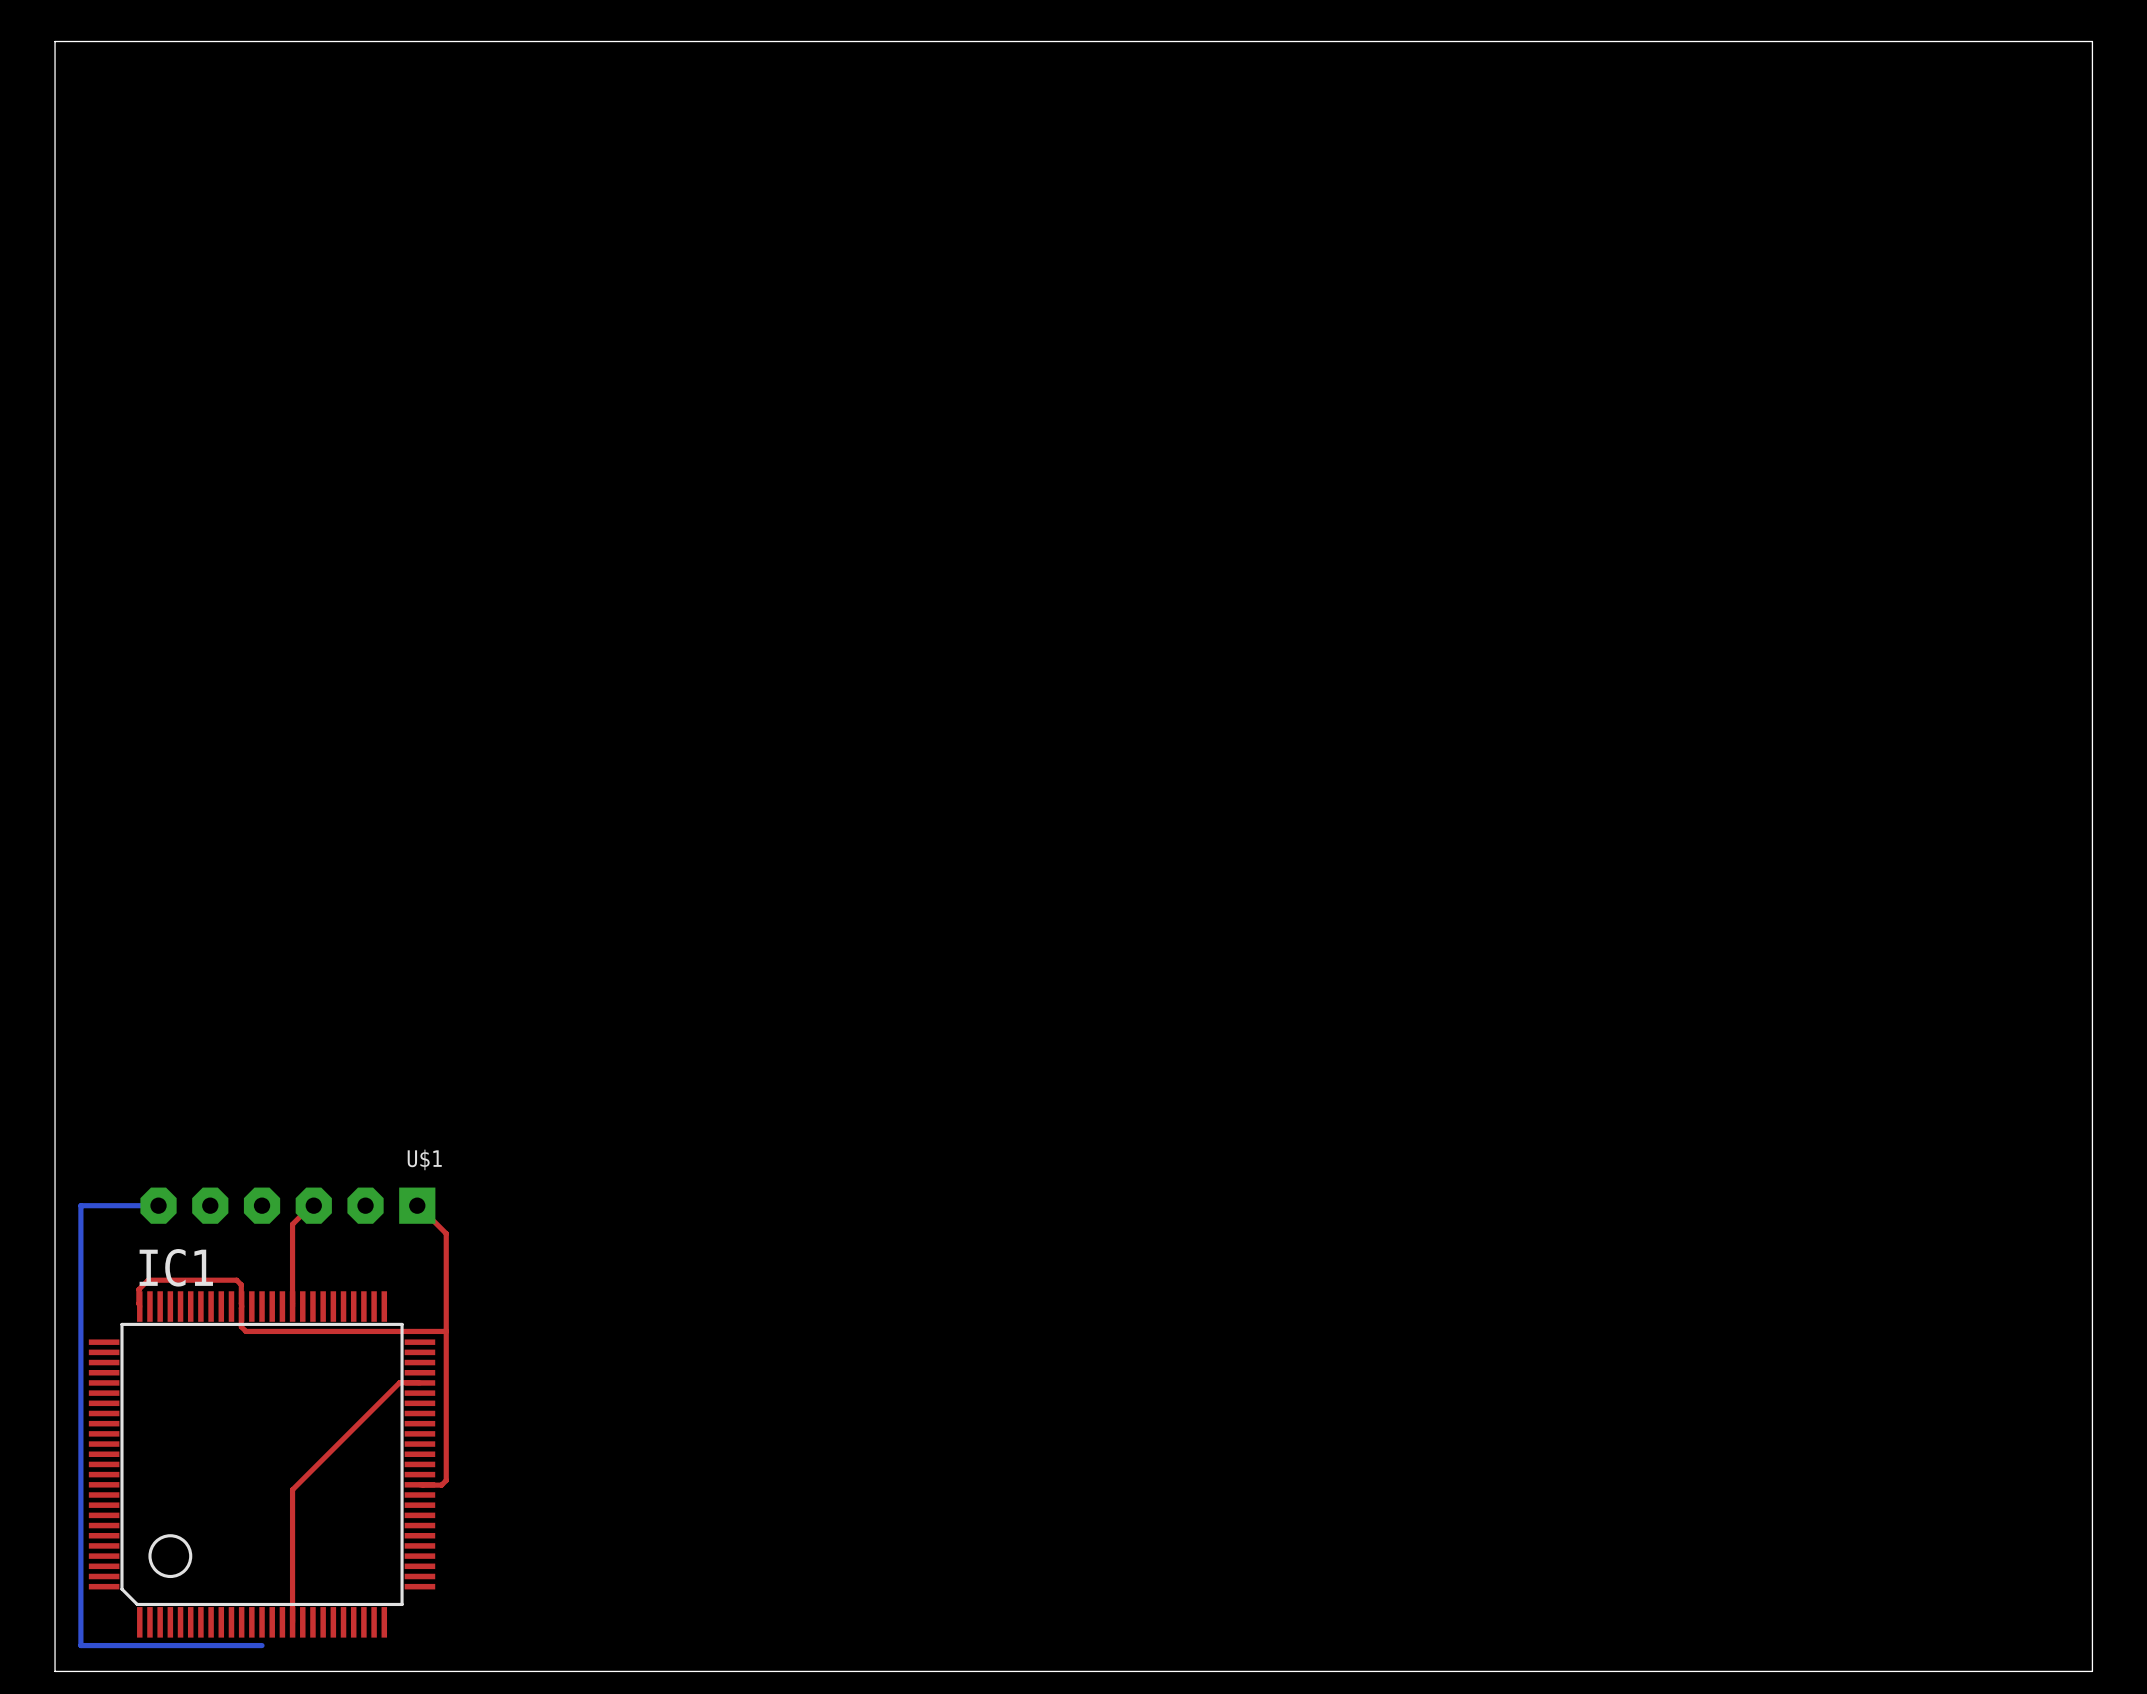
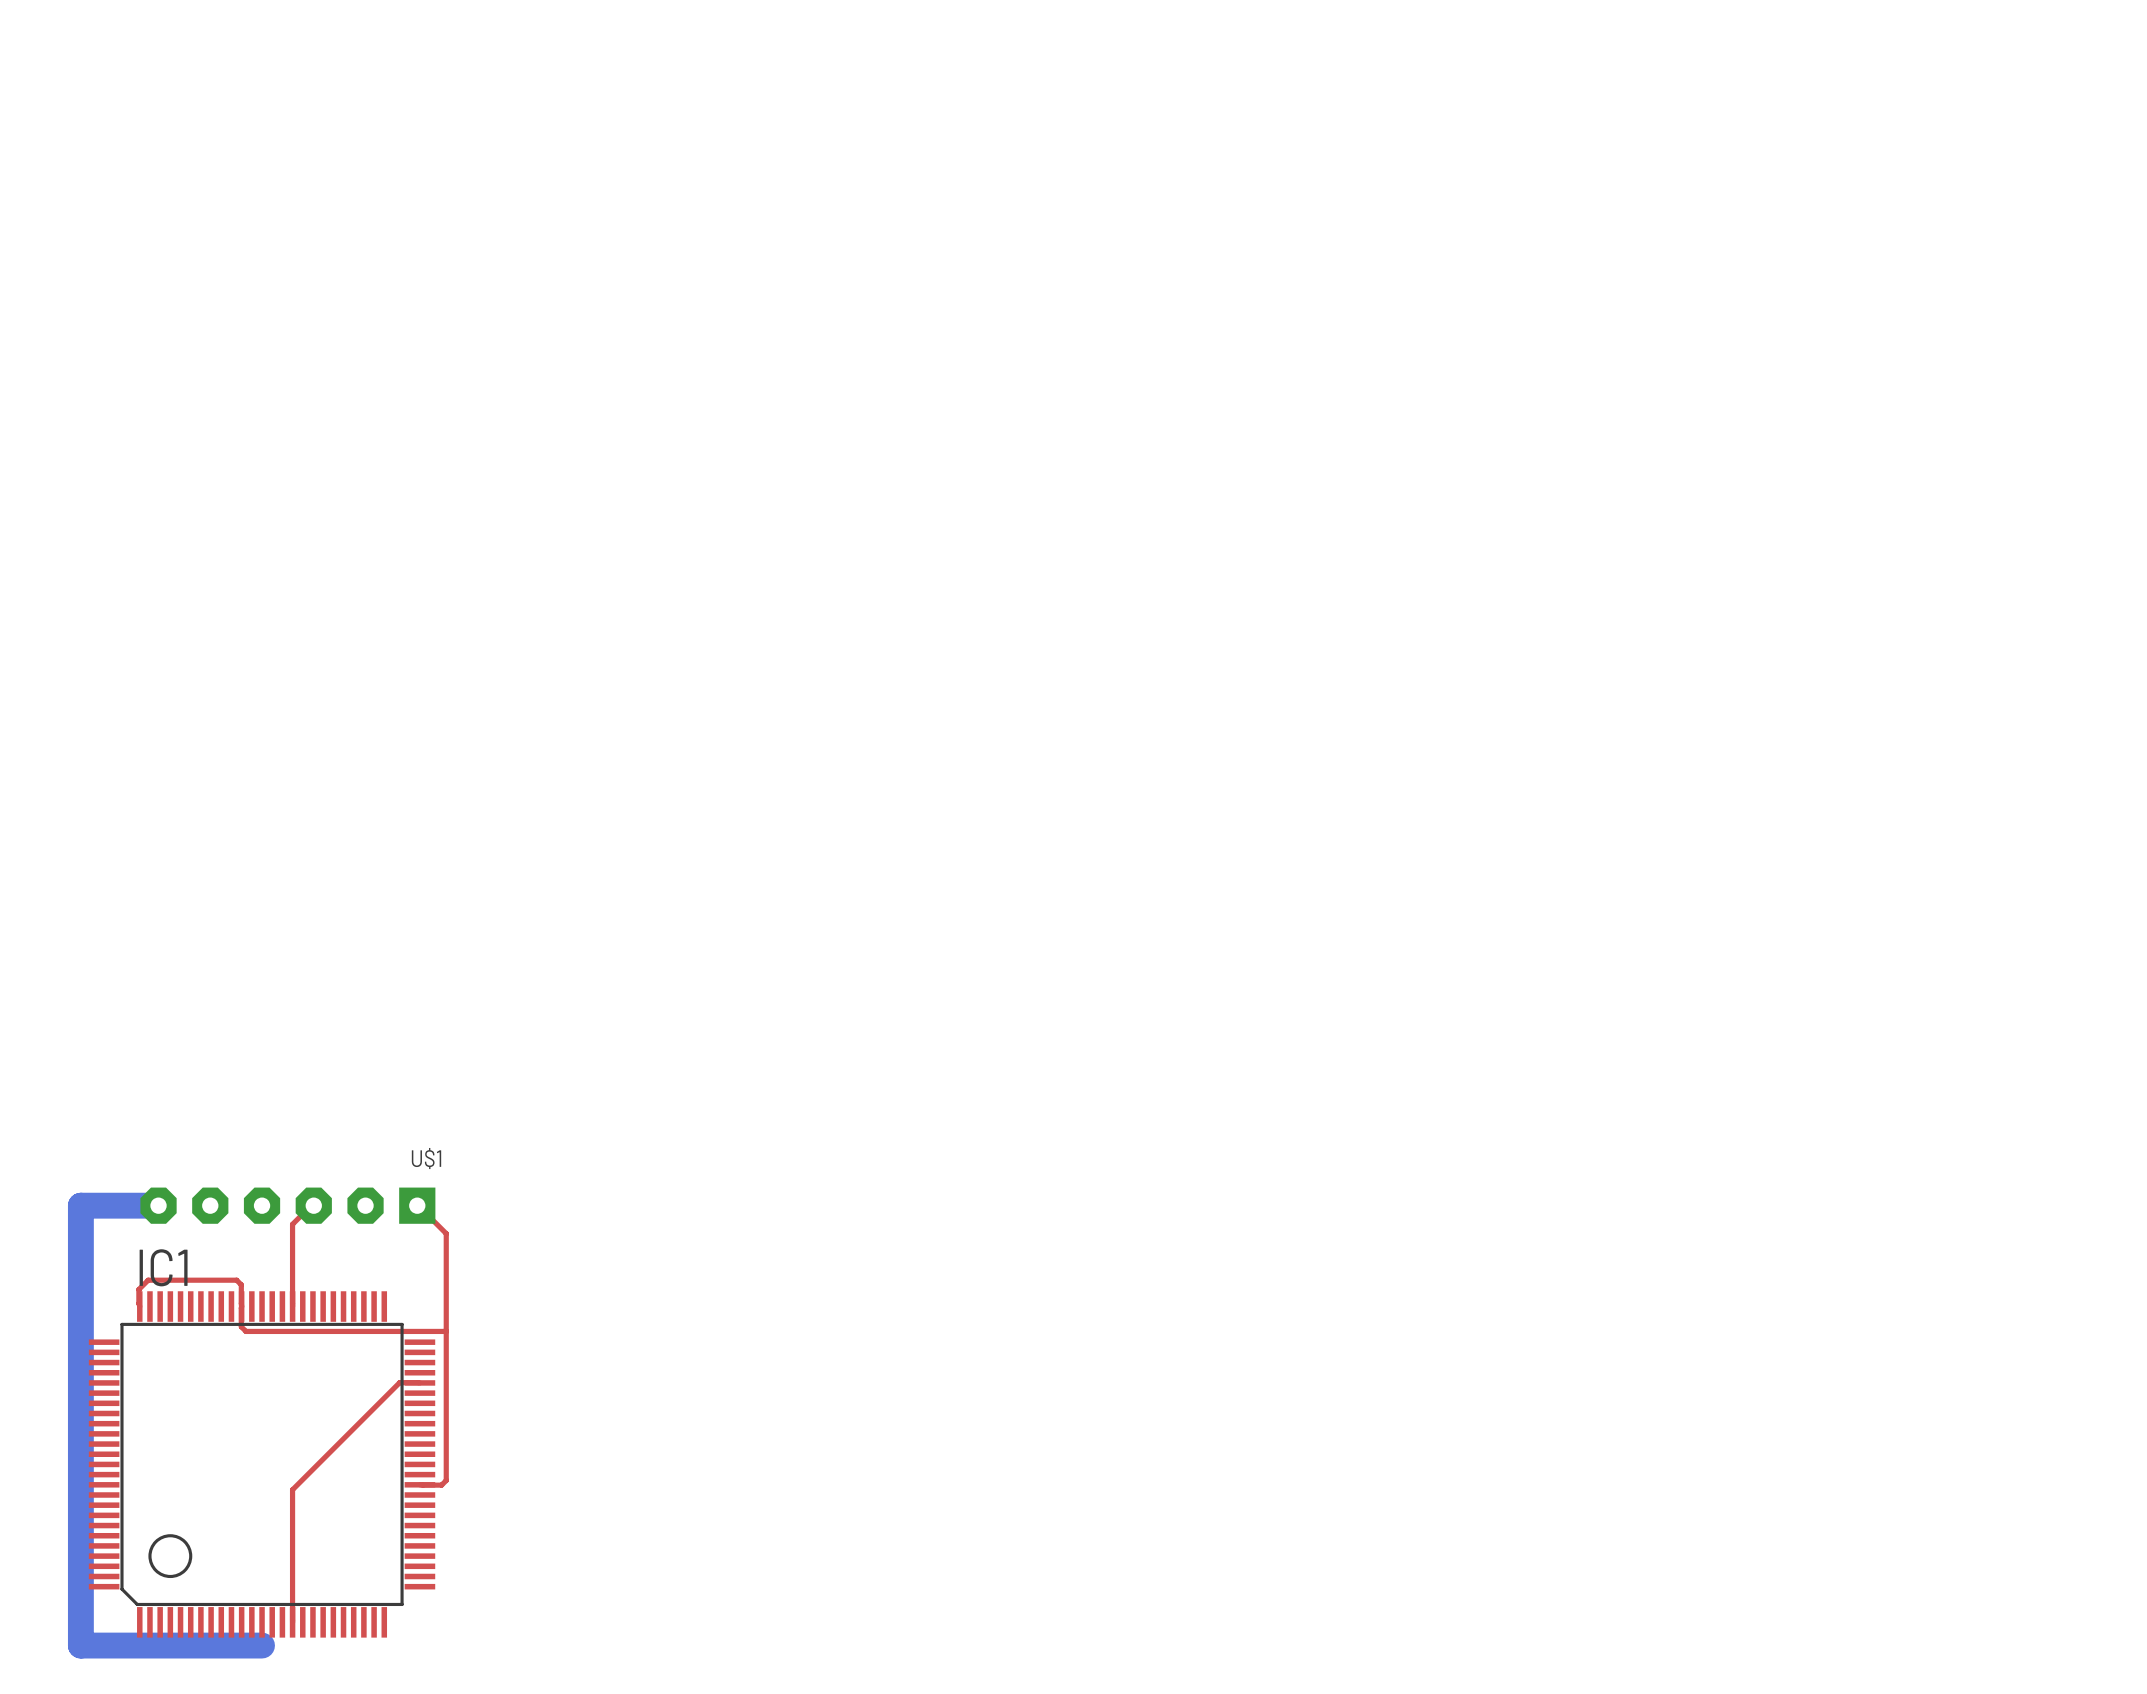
board edge: (55, 41) (2092, 41) (2092, 1671) (55, 1671) (55, 41) -> none
bottom track width: thin (158, 1205) (80, 1205) (80, 1645) (262, 1645) -> thick (158, 1205) (80, 1205) (80, 1645) (262, 1645)

